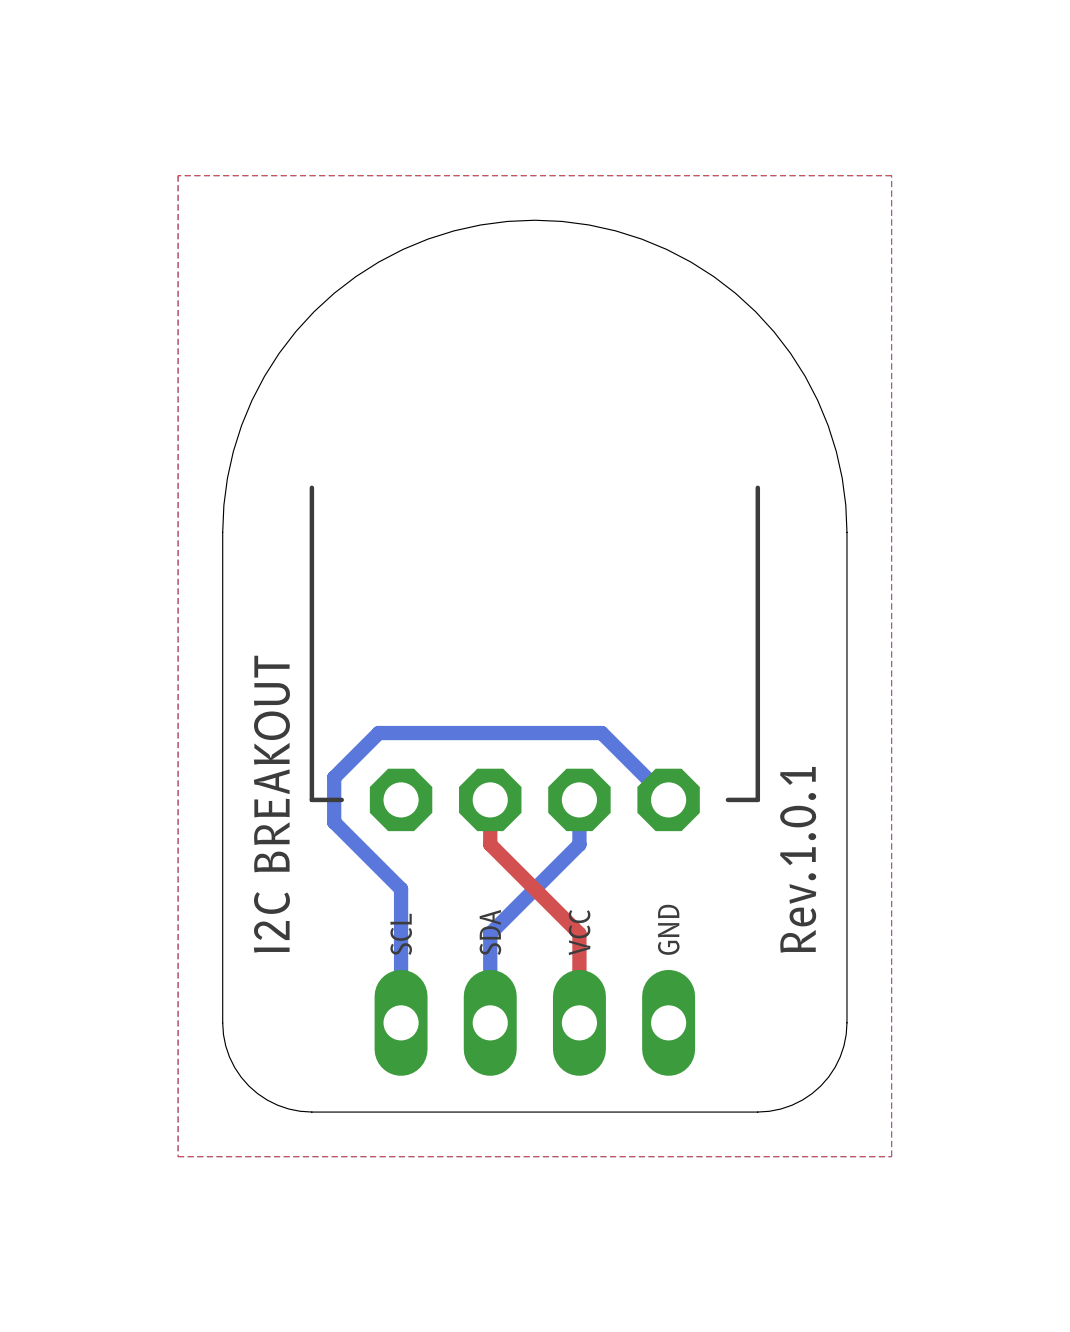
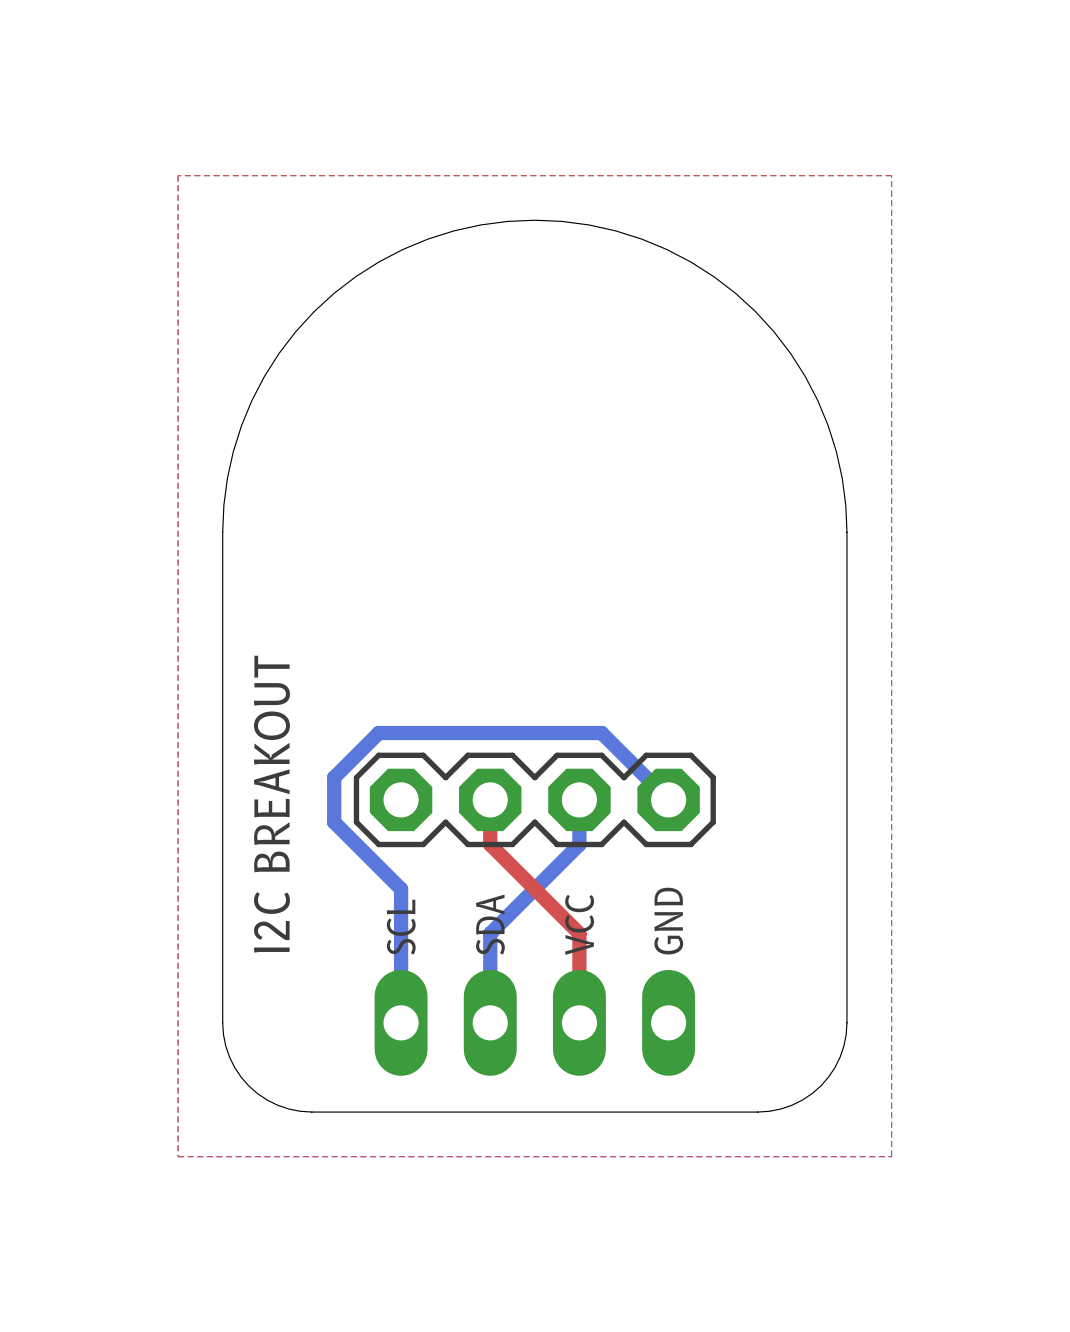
part footprint: [222, 220, 847, 1113] -> [222, 220, 847, 1113]
part: (534, 658) -> none
part: none -> (534, 799)
text: Rev.1.0.1 (798, 859) -> none

